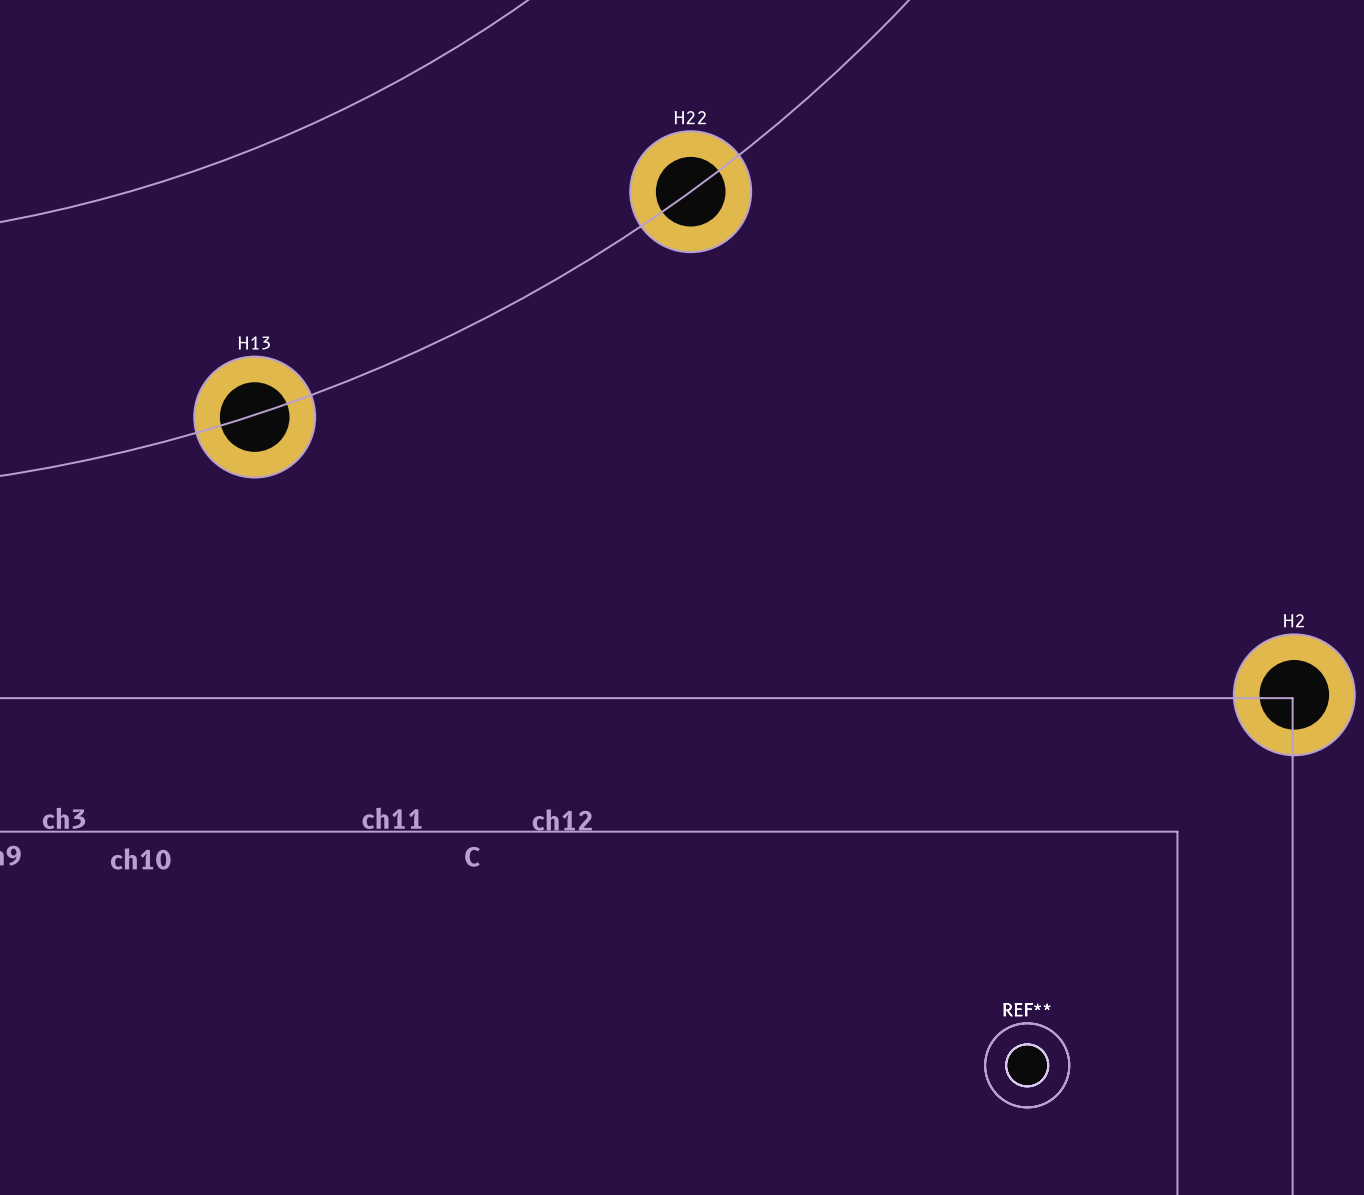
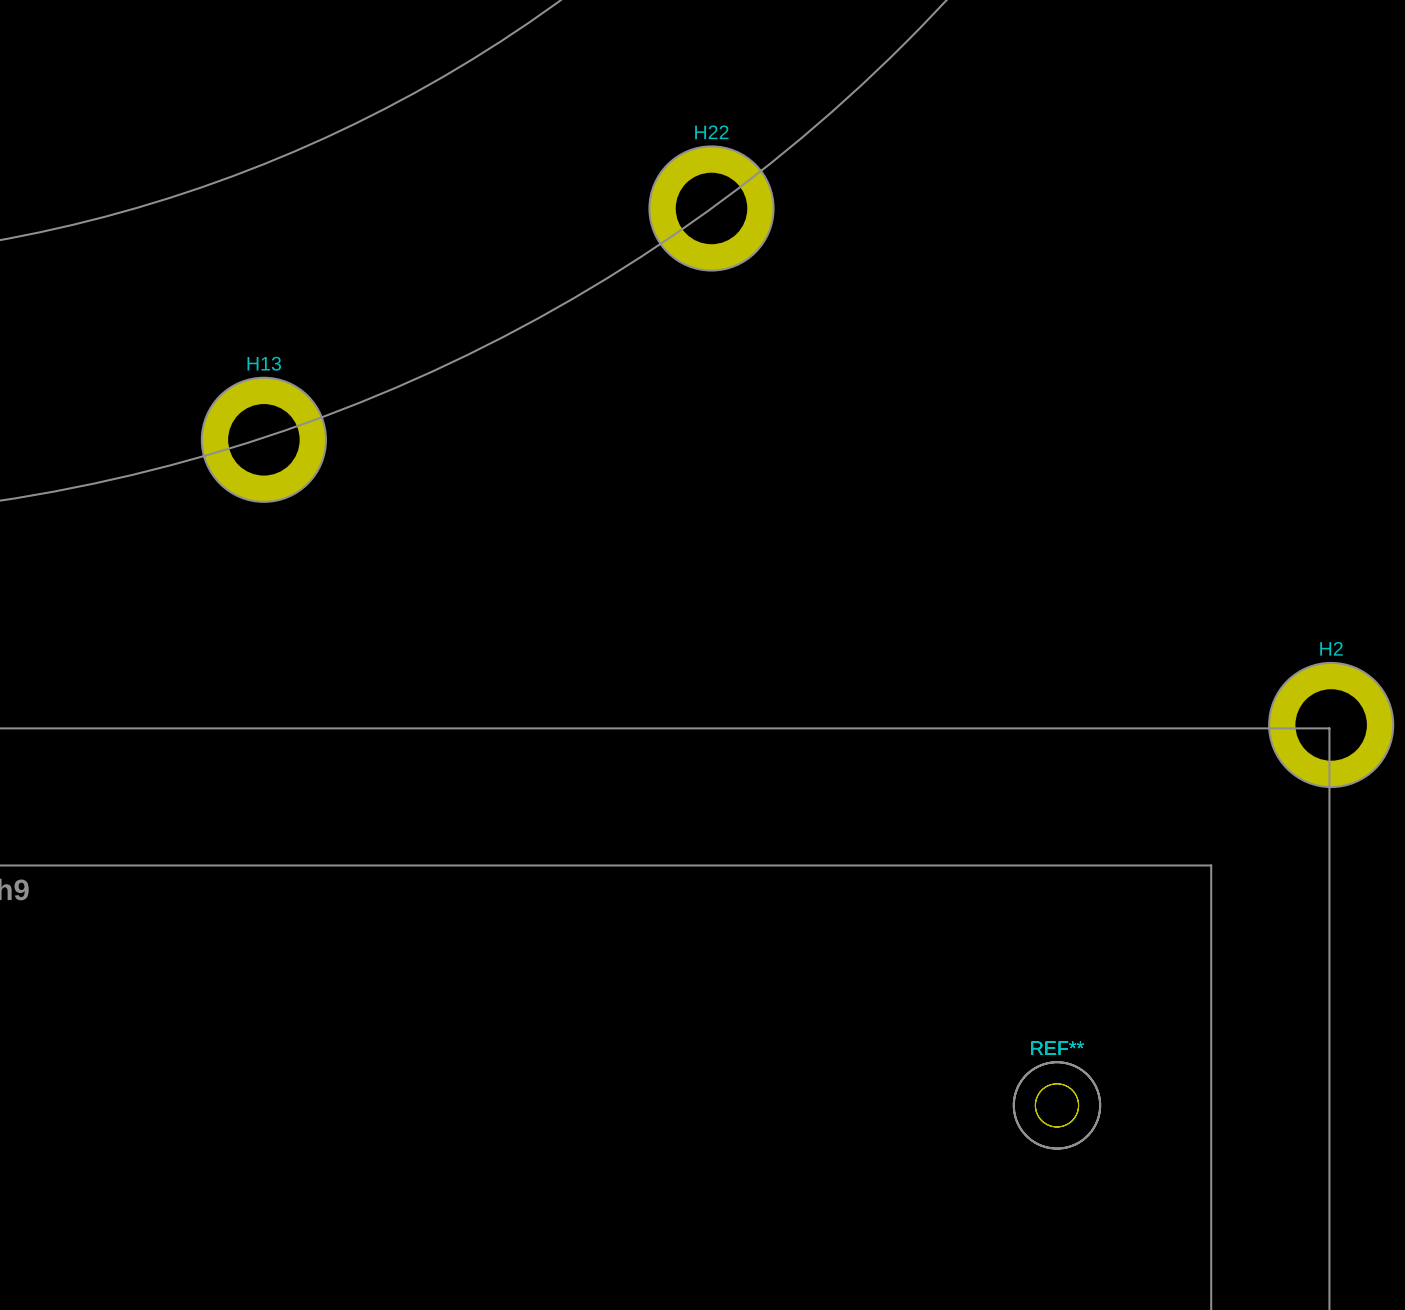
text: ch3 (64, 818) -> none
text: ch11 (392, 818) -> none
text: ch12 (562, 819) -> none
text: C (472, 856) -> none
text: ch10 (140, 858) -> none

